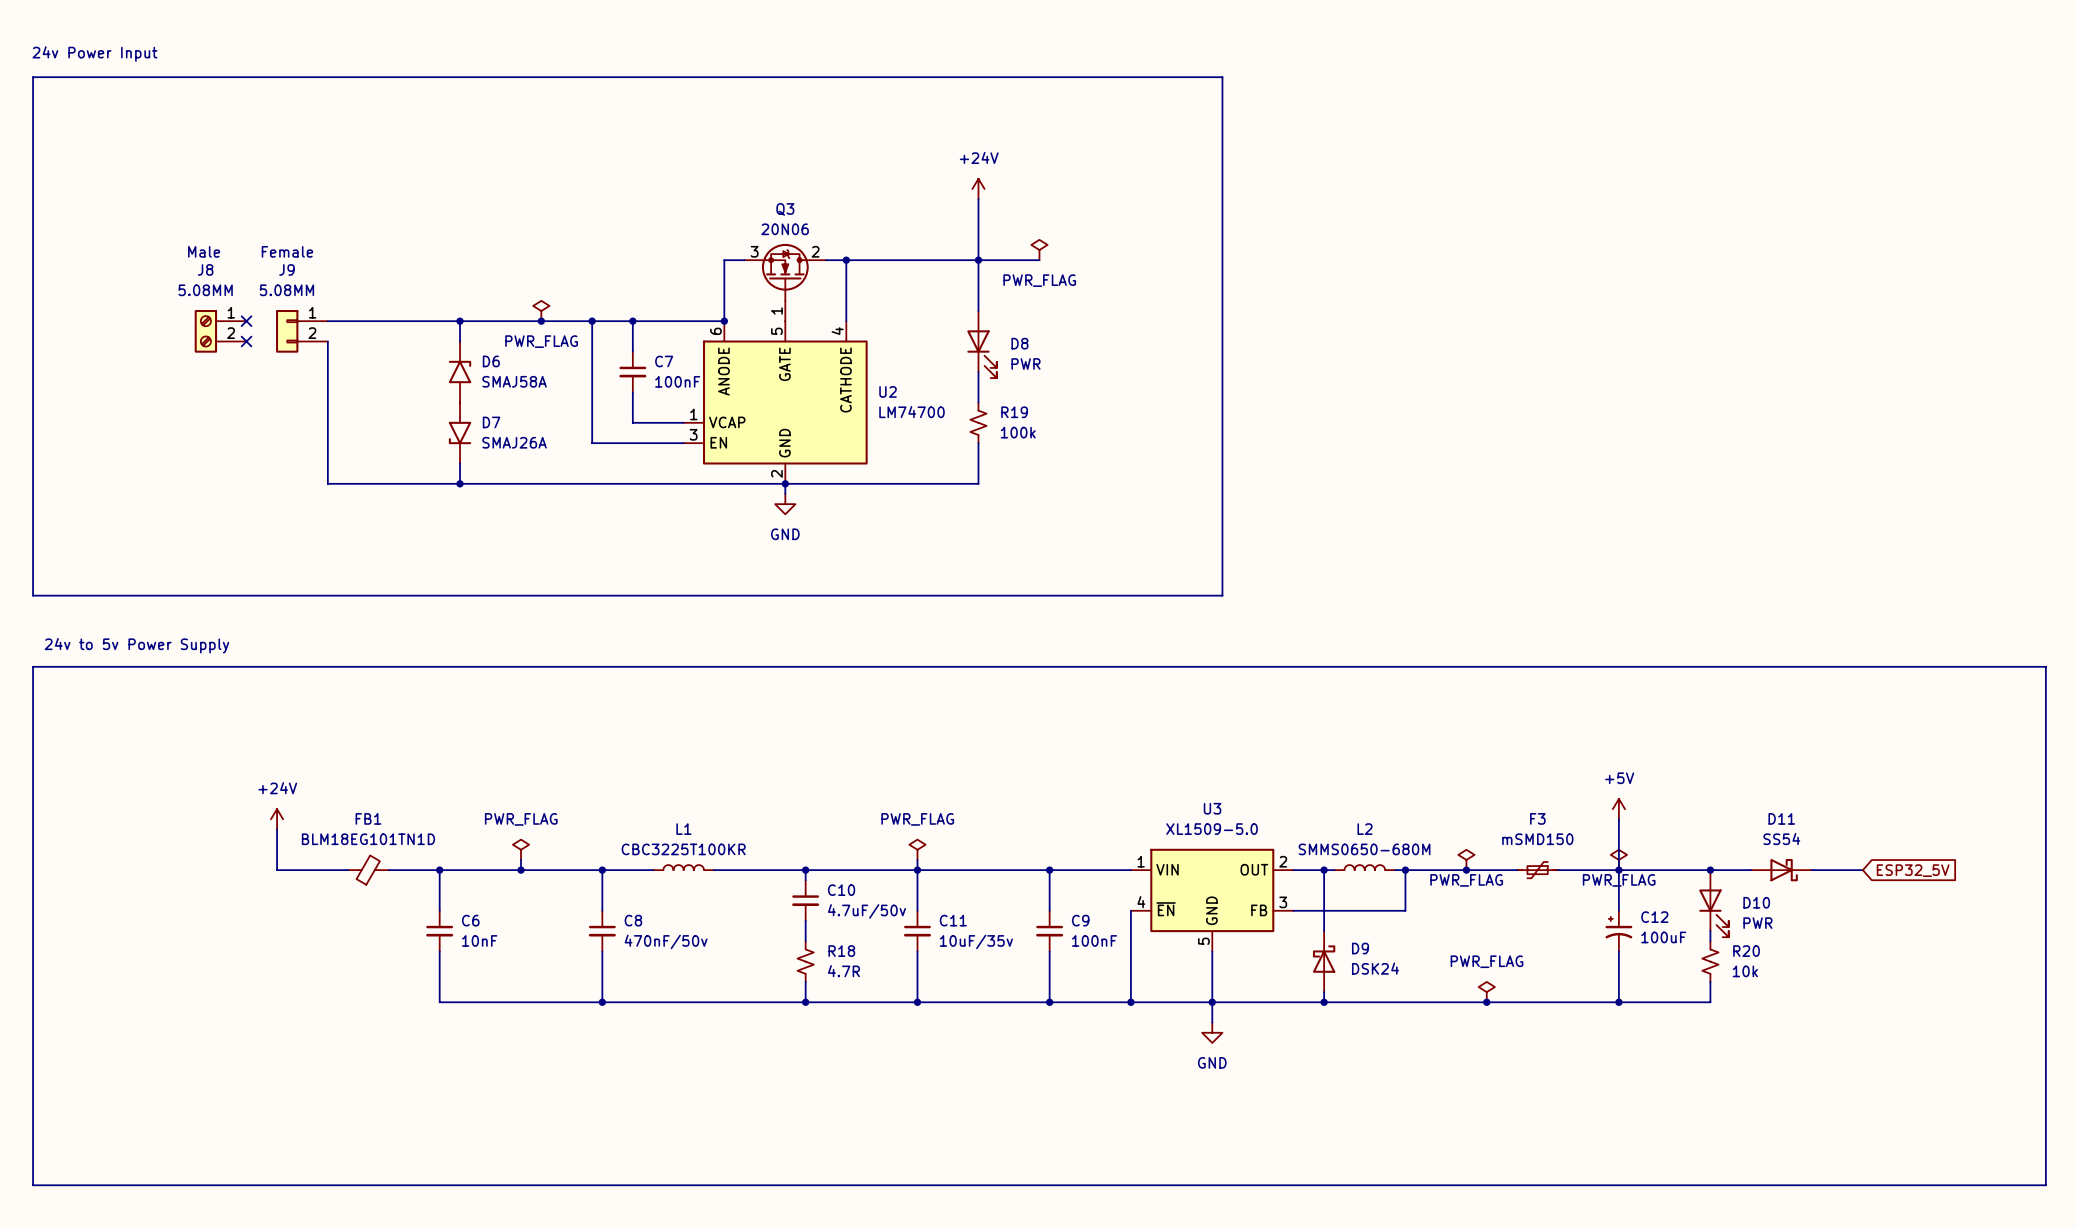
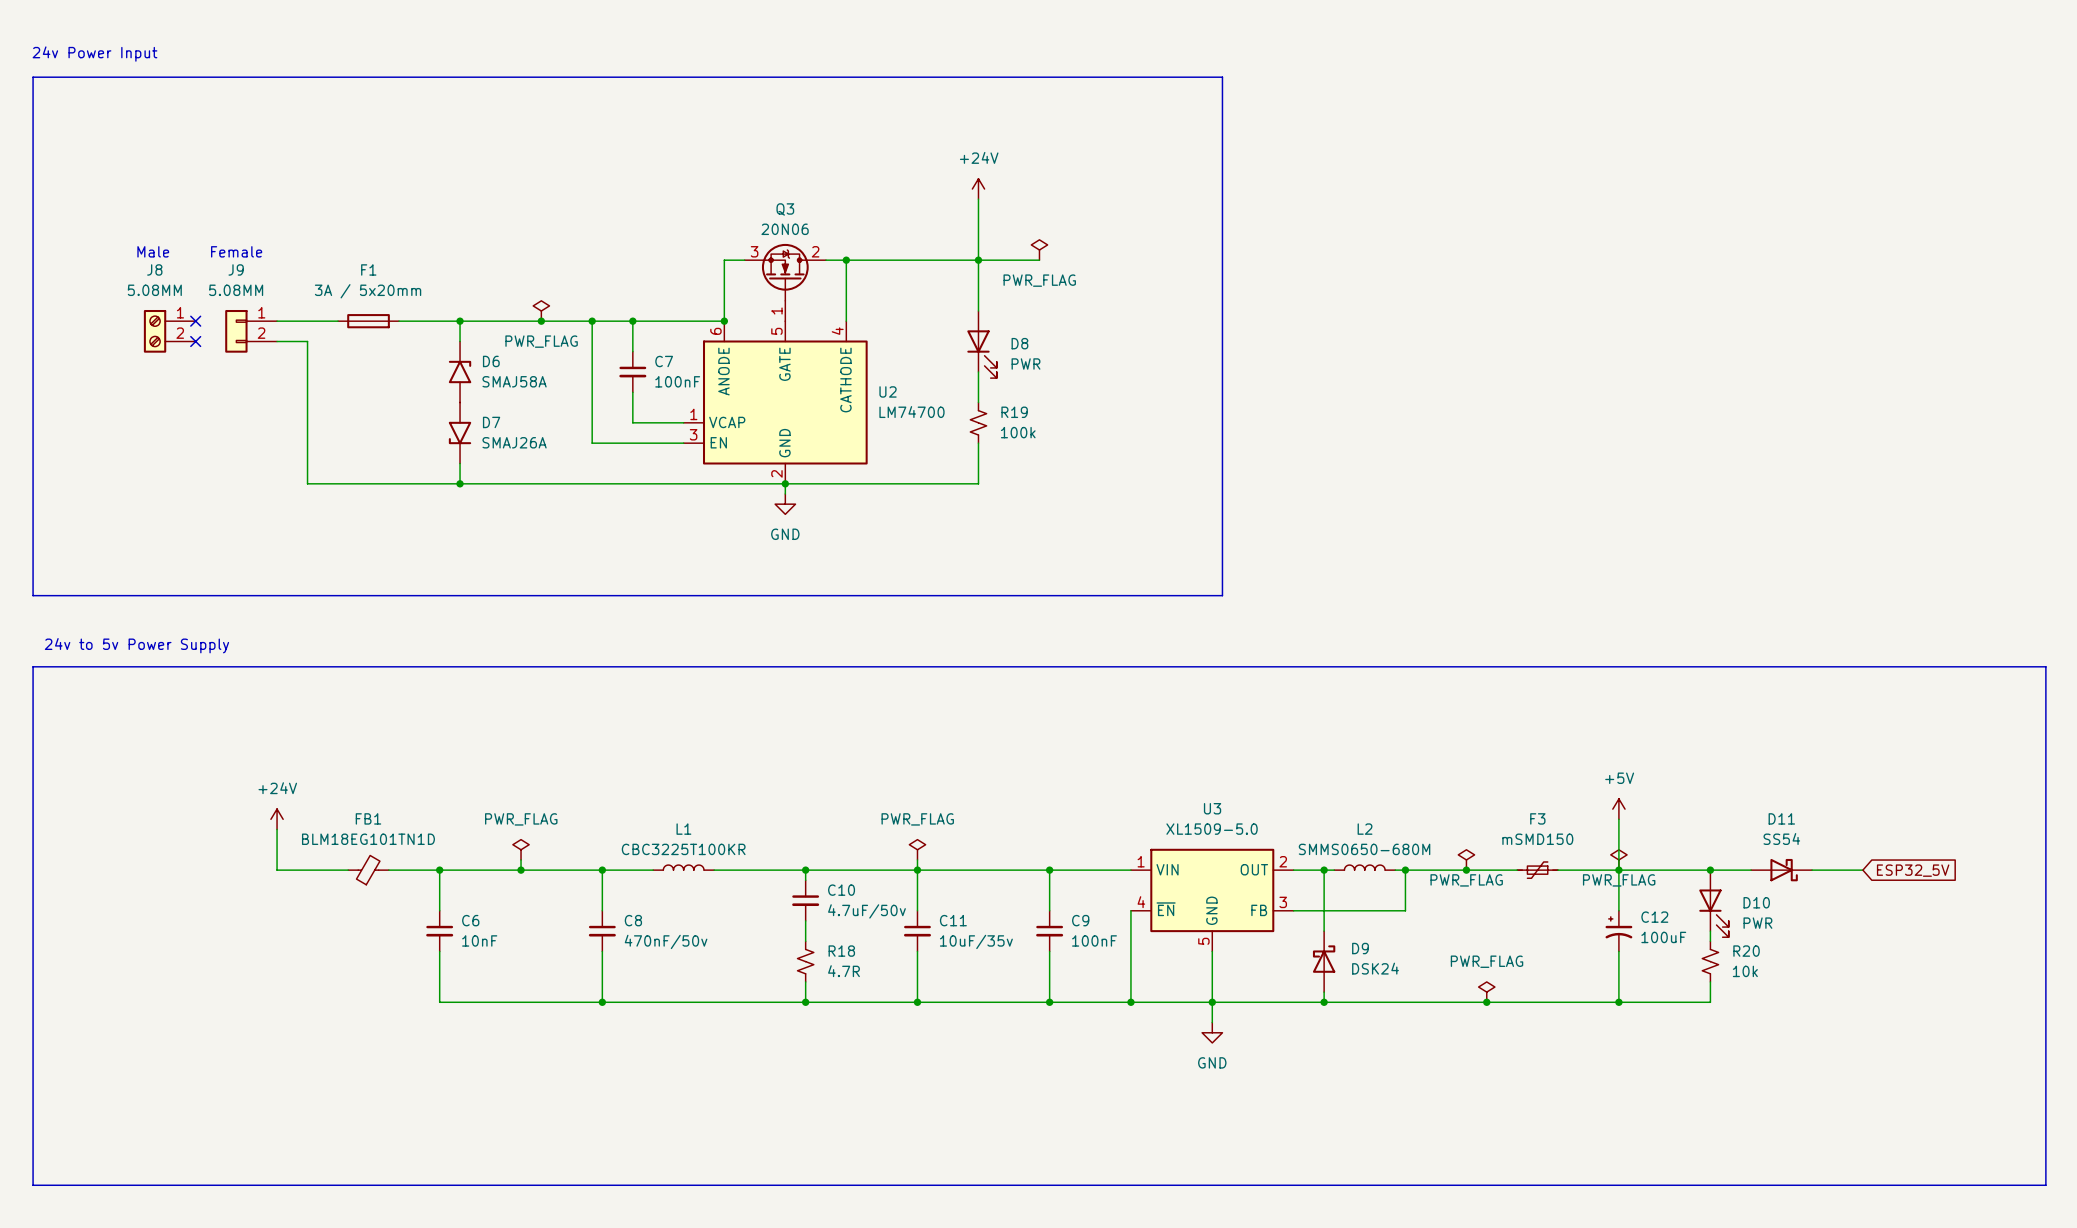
text position: Male (204, 251) -> Male (153, 251)
text position: Female (287, 251) -> Female (236, 251)
no-connect mark: none -> (195, 321)
no-connect mark: (246, 321) -> none
F1: none -> 3A / 5x20mm (368, 321)
J8 position: (220, 331) -> (169, 331)
J9 position: (301, 331) -> (251, 331)
no-connect mark: none -> (195, 341)
no-connect mark: (246, 341) -> none
wire: (327, 341) (327, 483) -> (277, 341) (307, 341) (307, 483) (327, 483)

